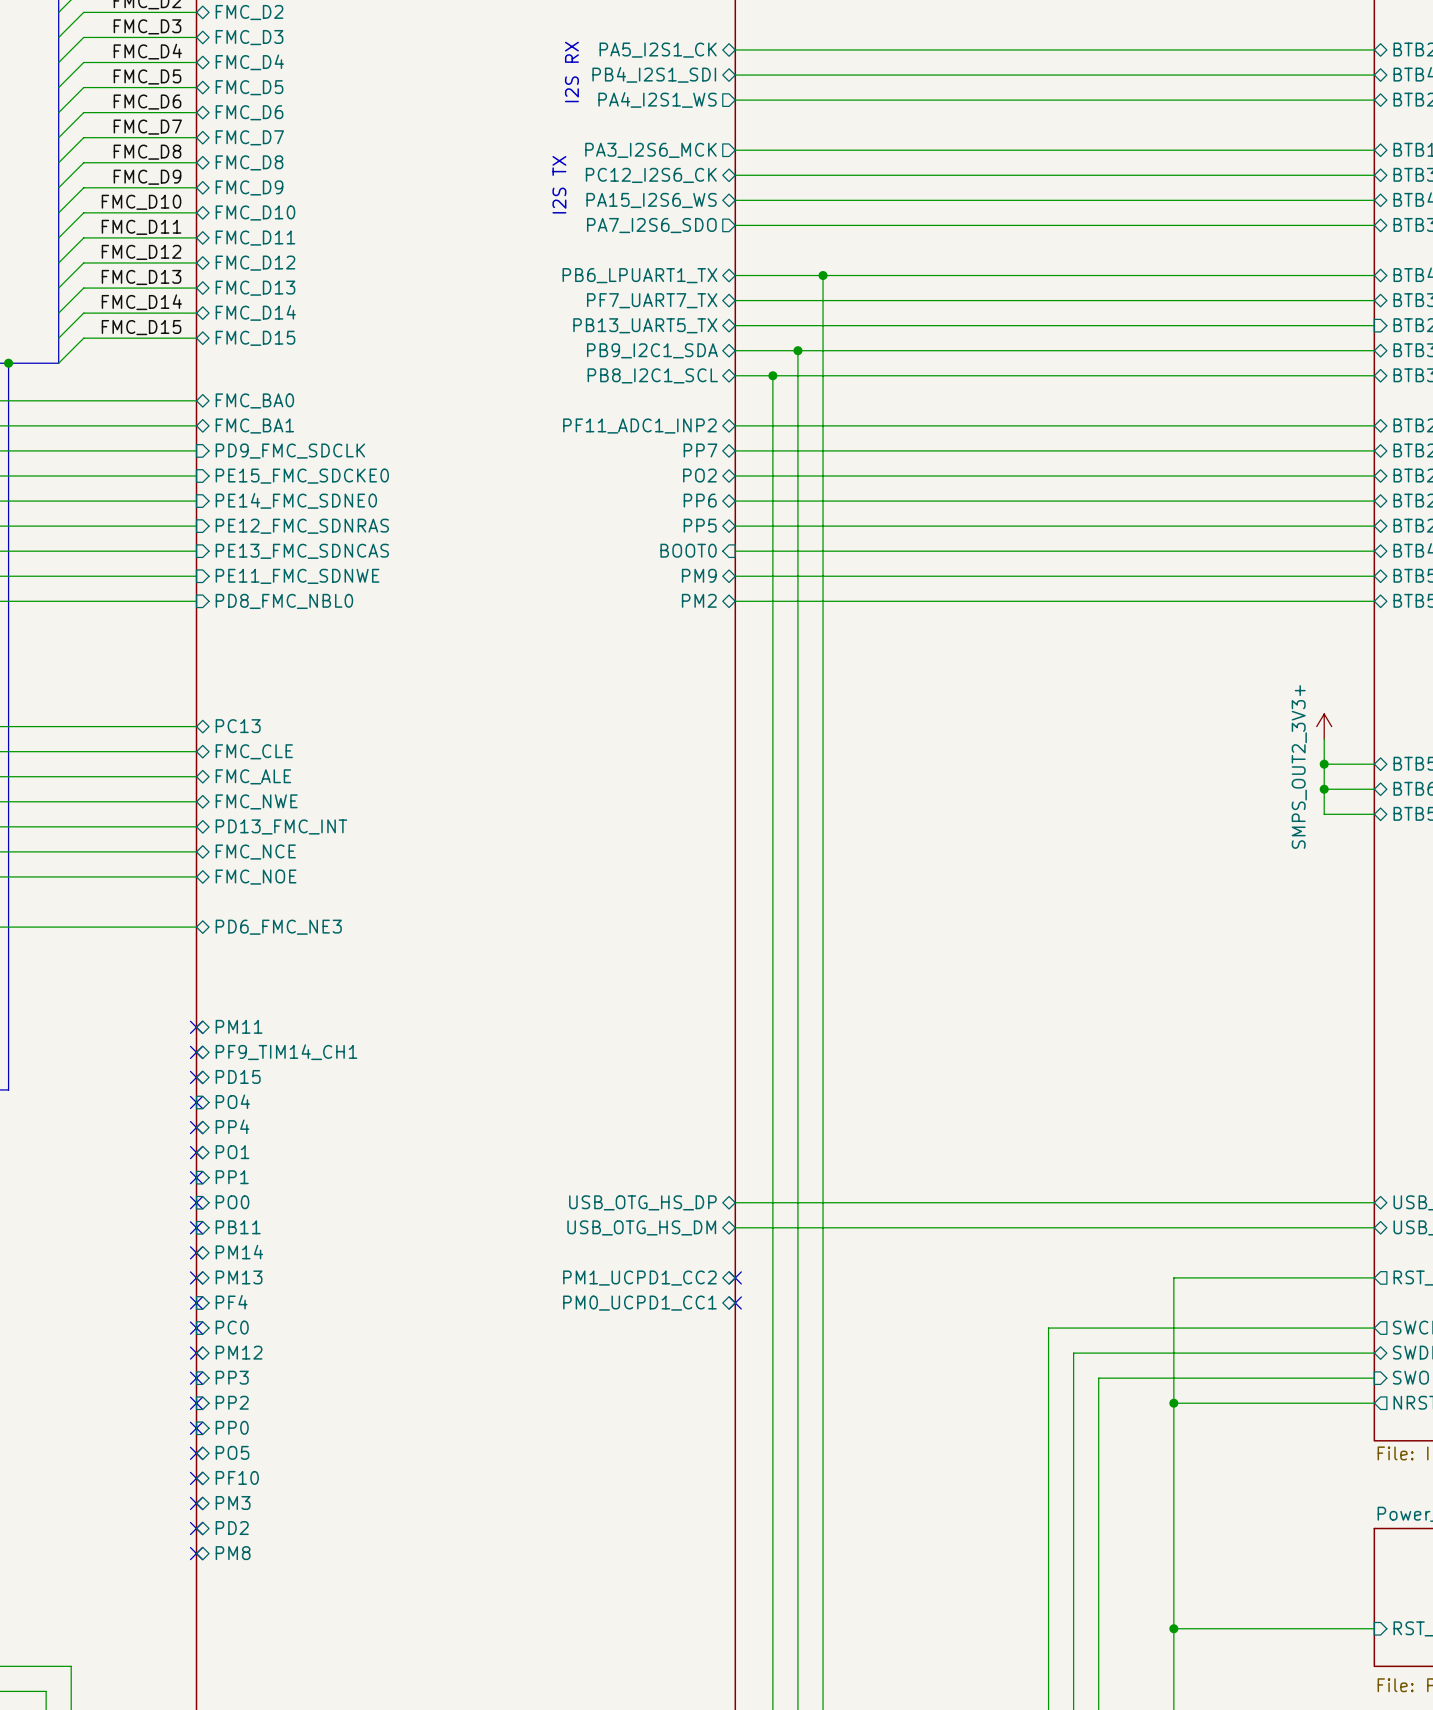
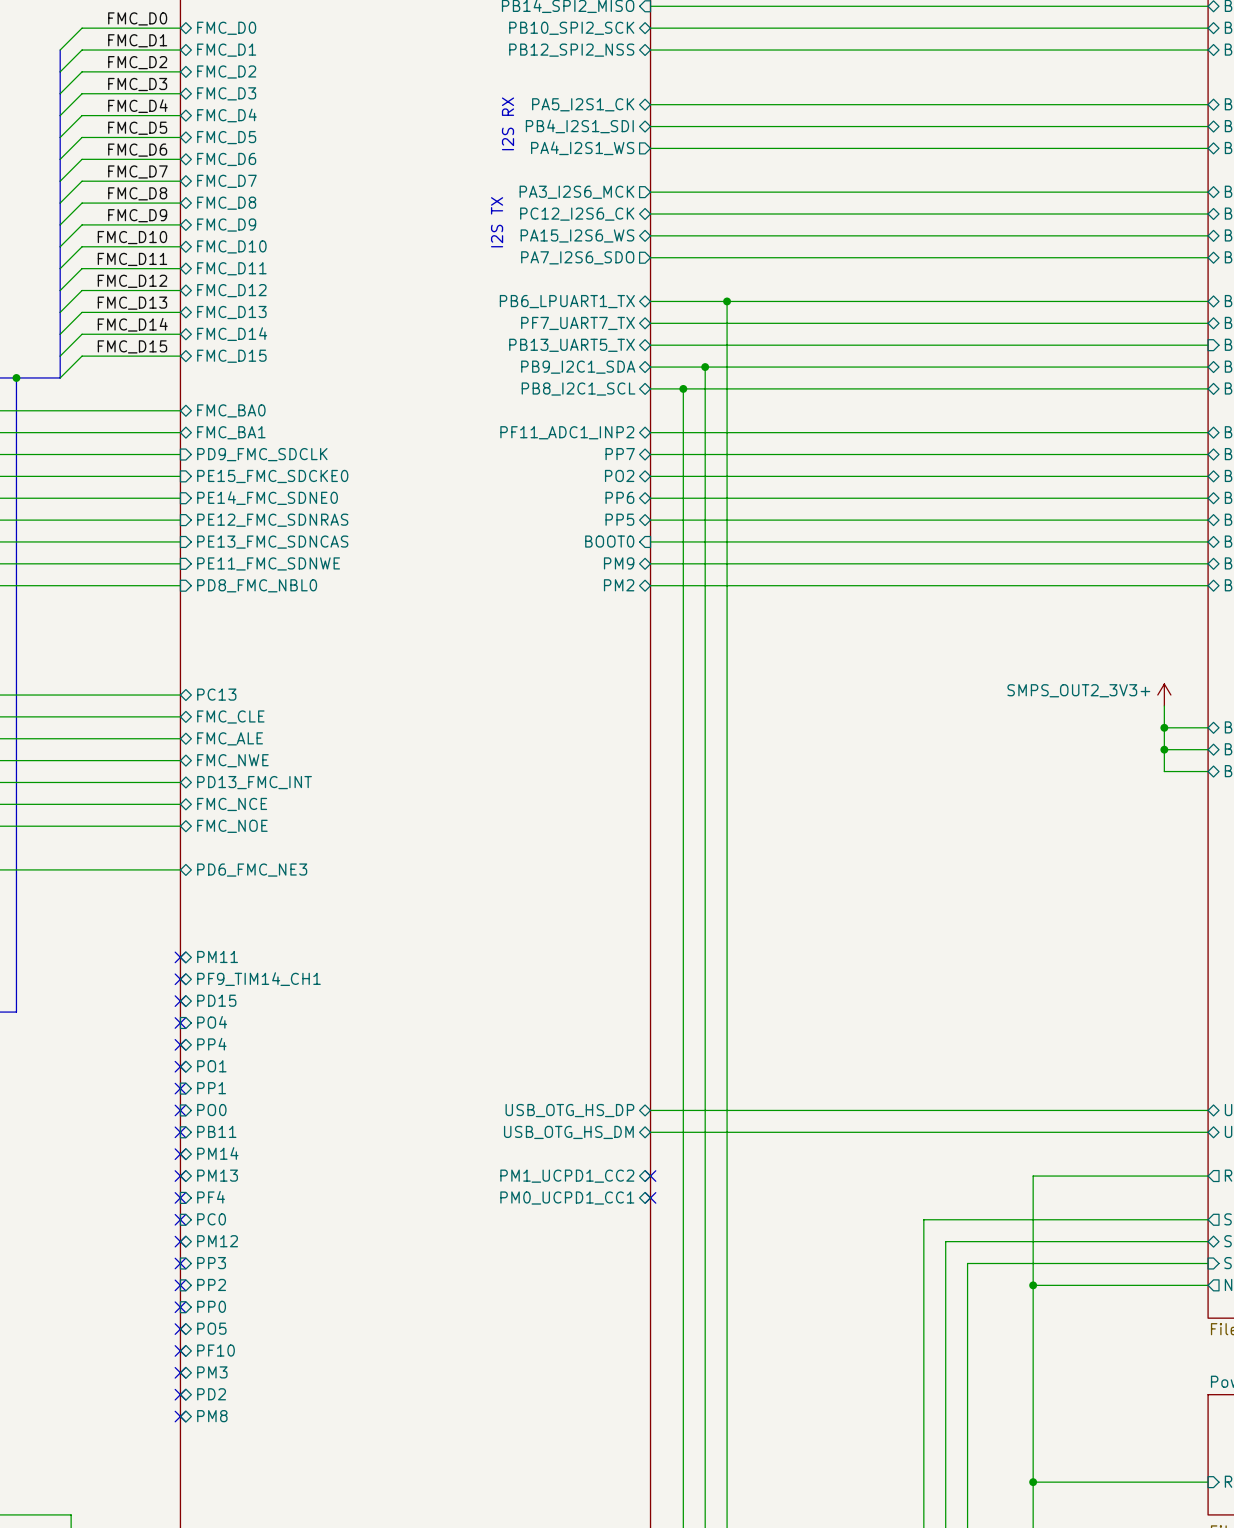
power symbol text rotation: 0° (1299, 766) -> 90° clockwise (1078, 690)

